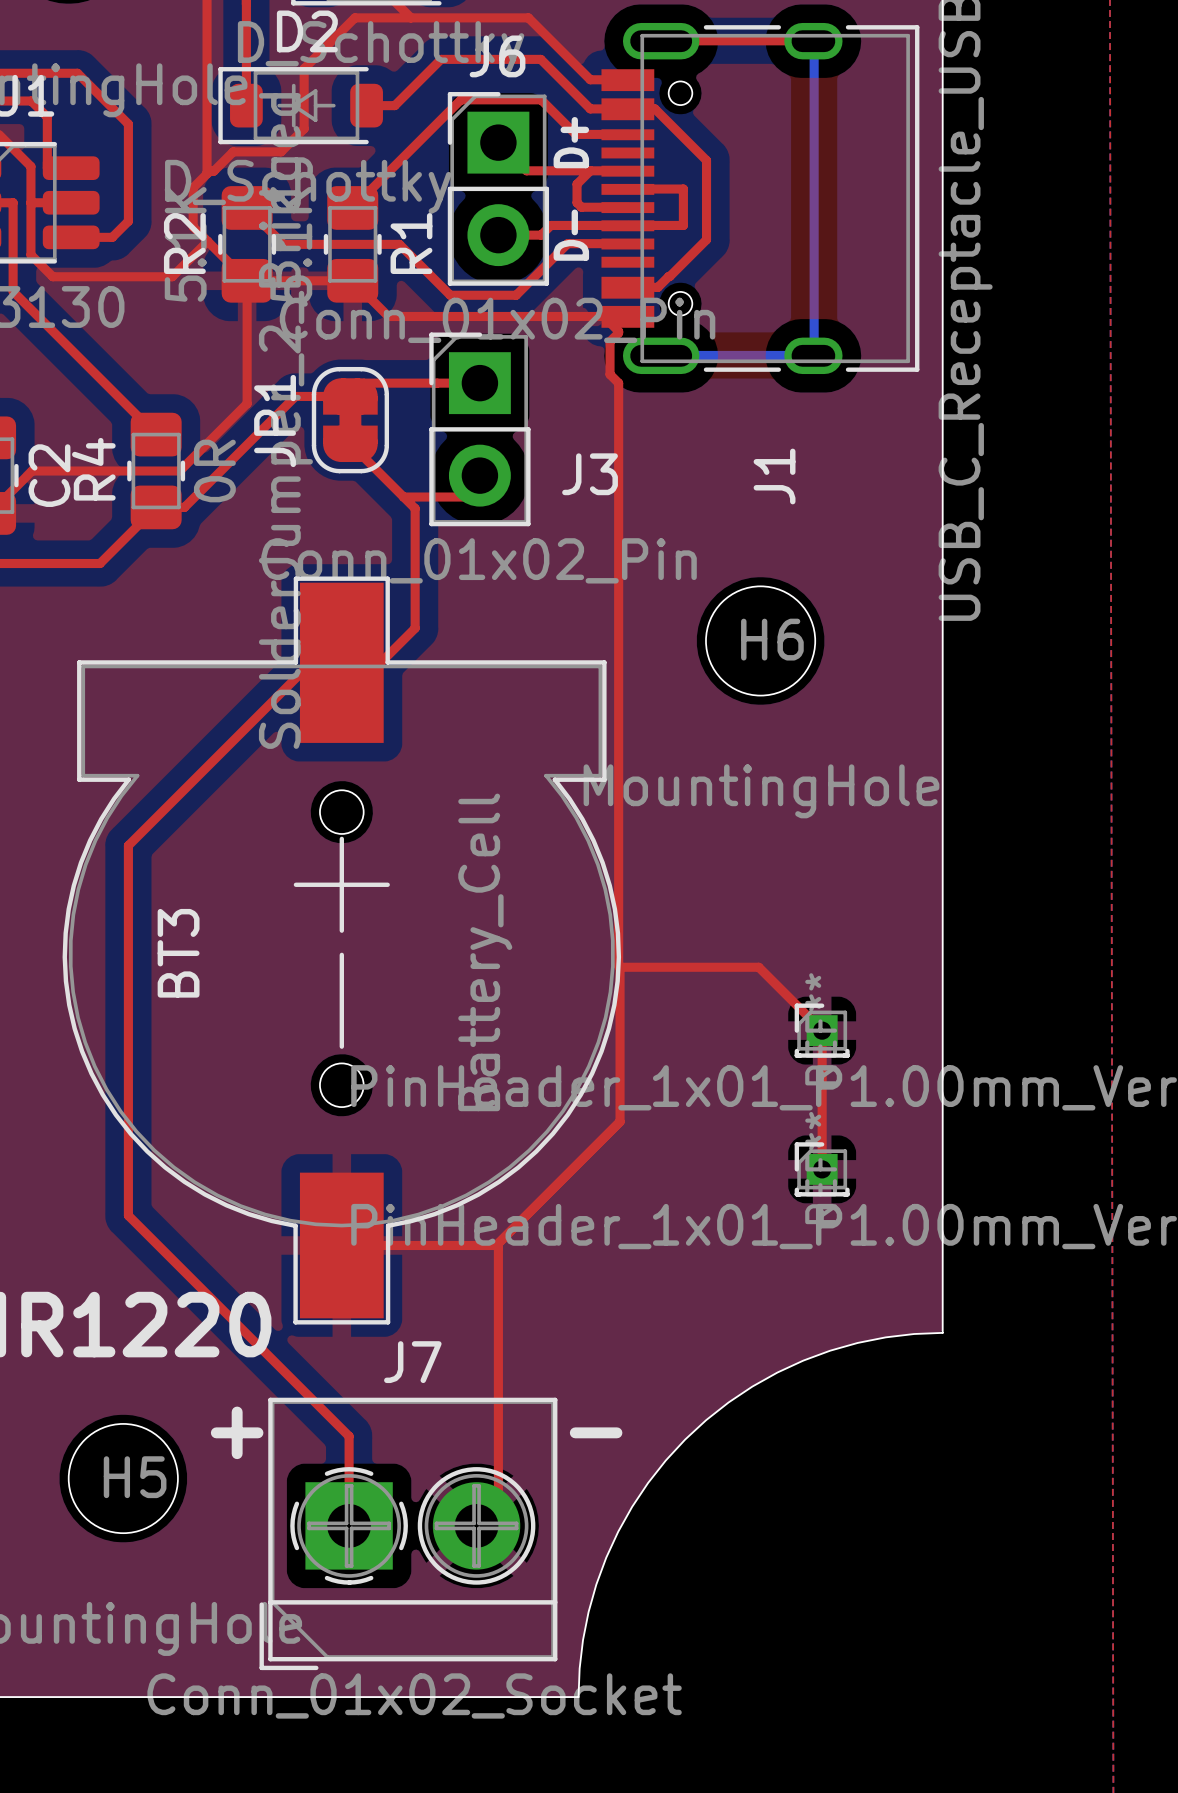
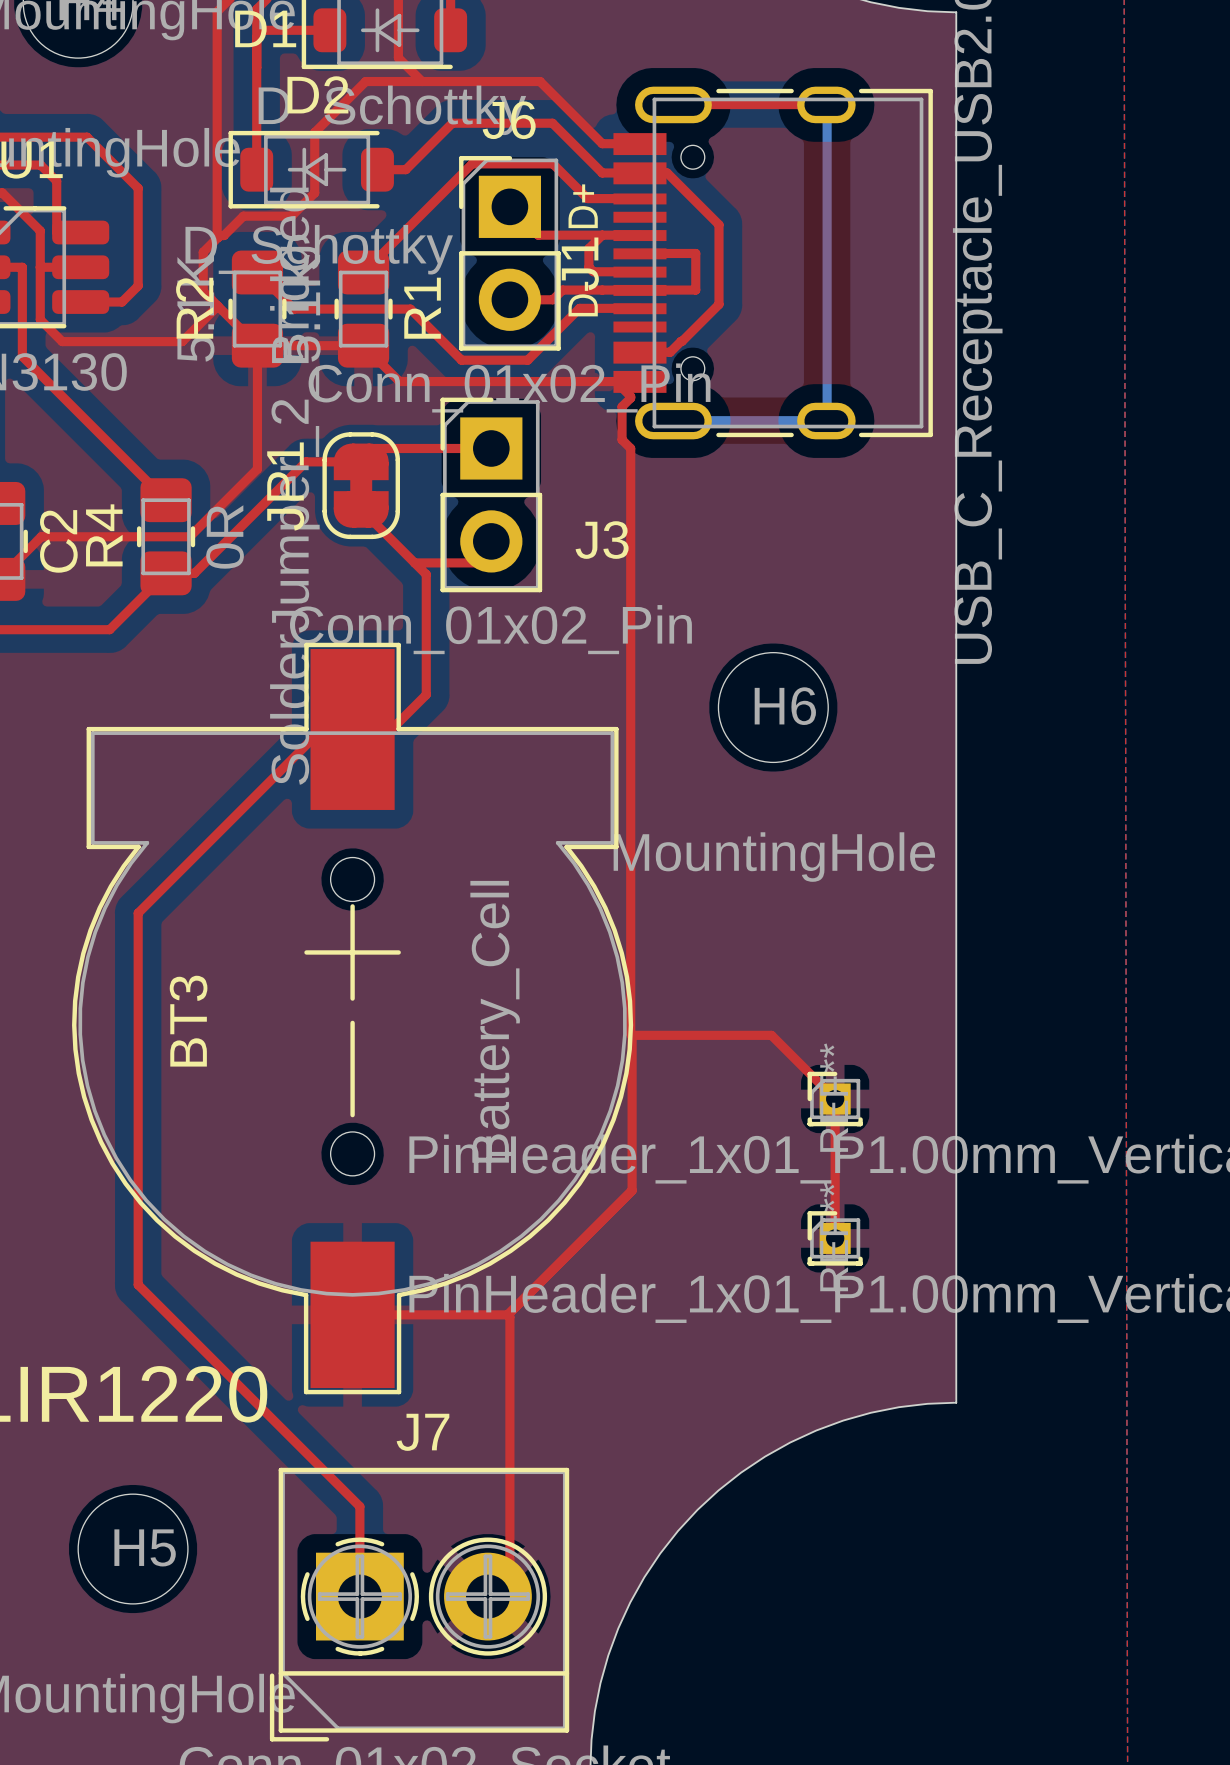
J1 name position: J1 (774, 476) -> J1 (580, 263)
text: + - (416, 1432) -> none

